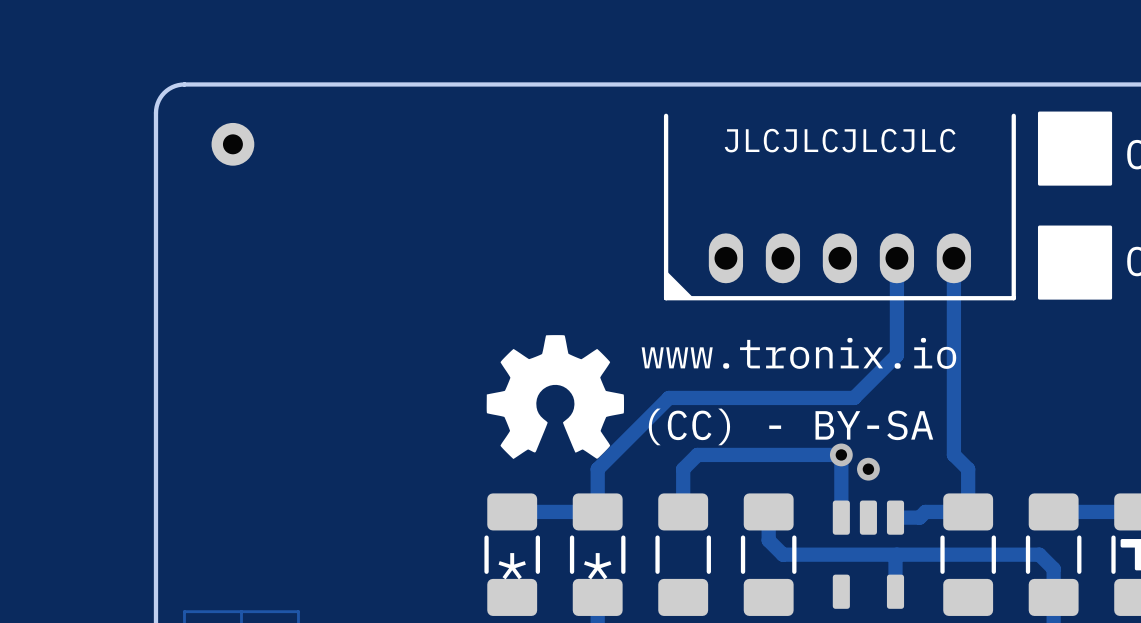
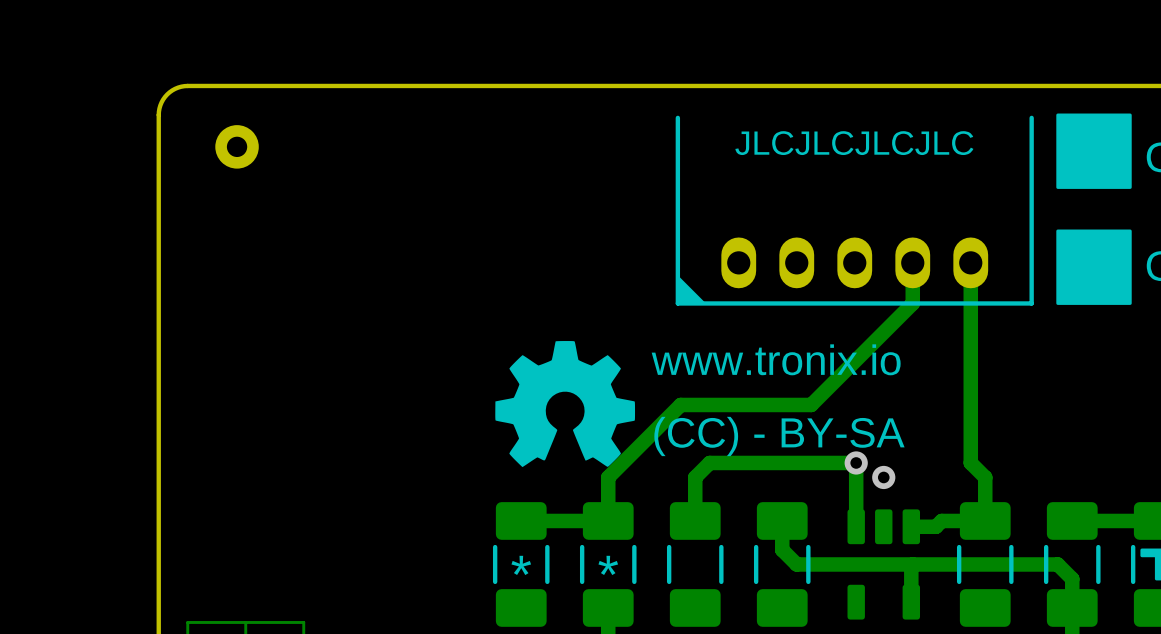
track: (896, 298) (896, 355) (854, 397) (797, 397) -> (912, 303) (811, 404)

